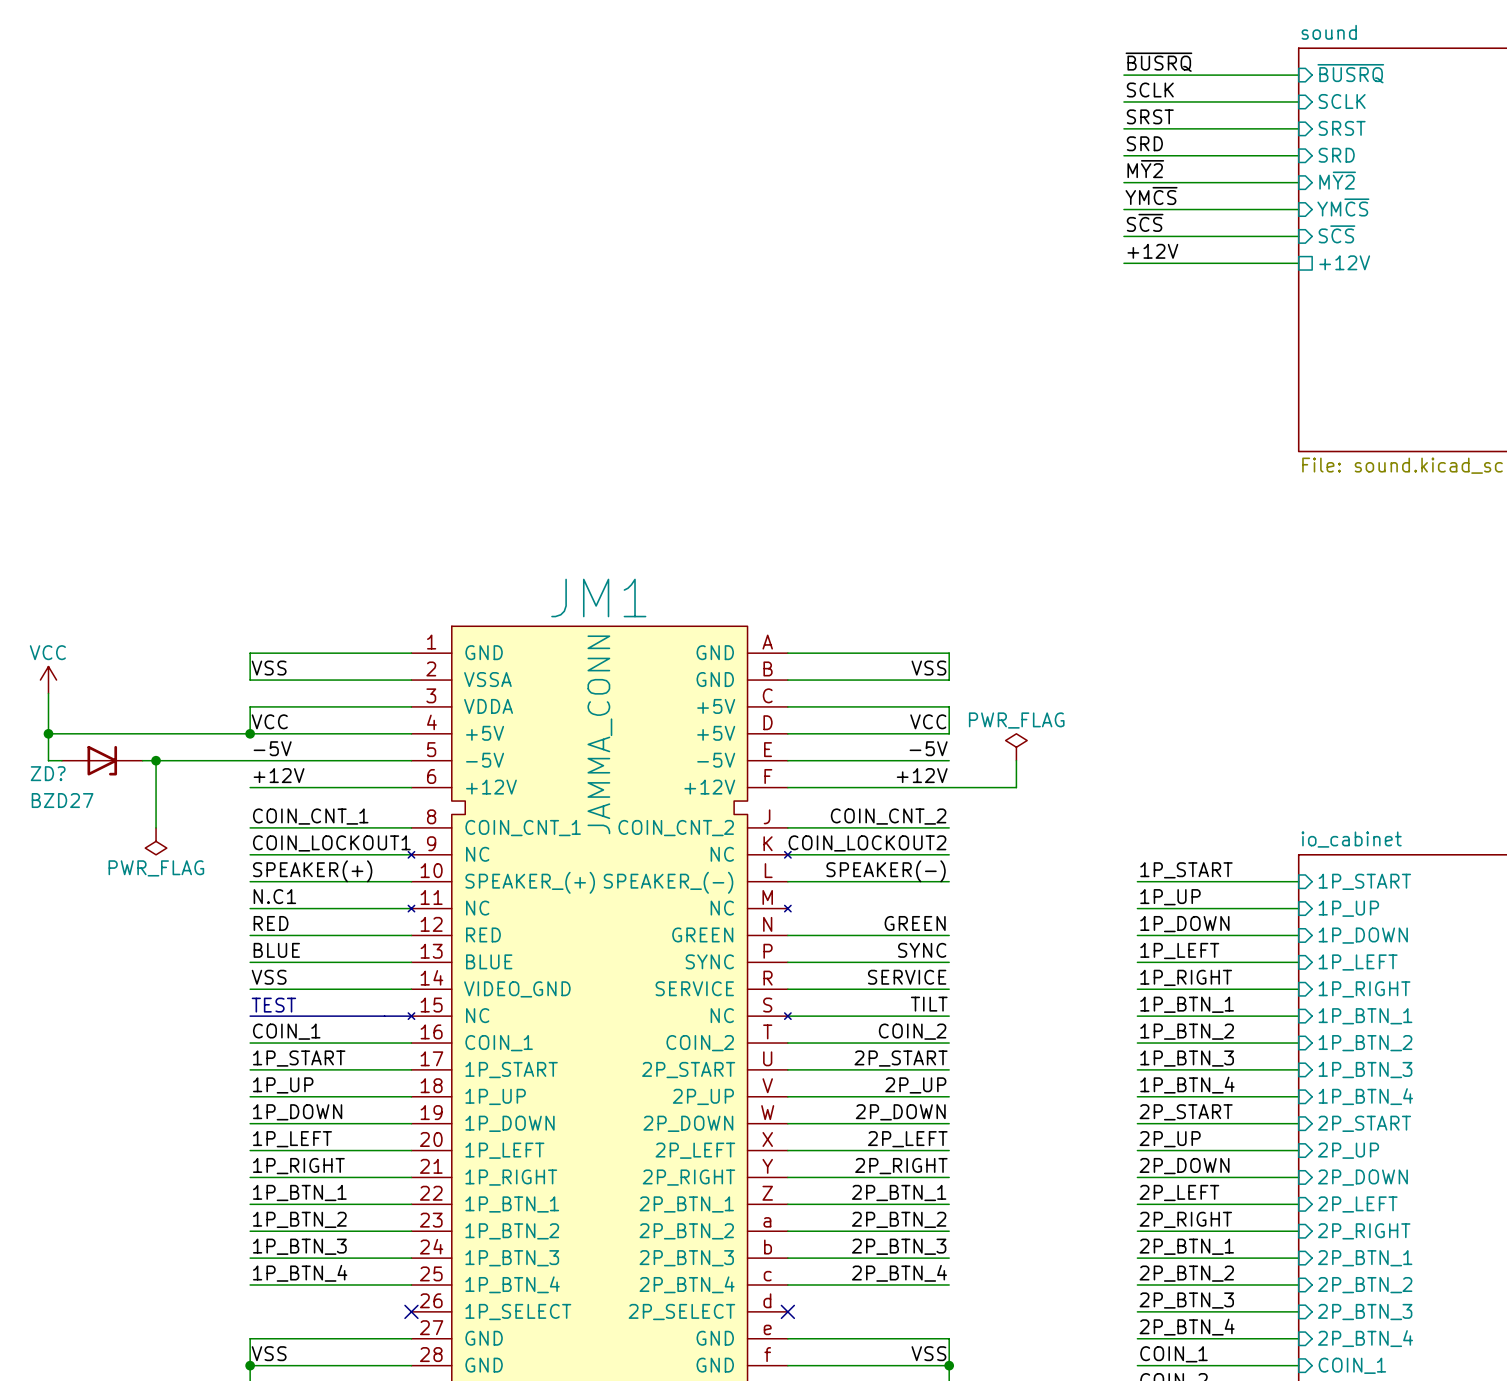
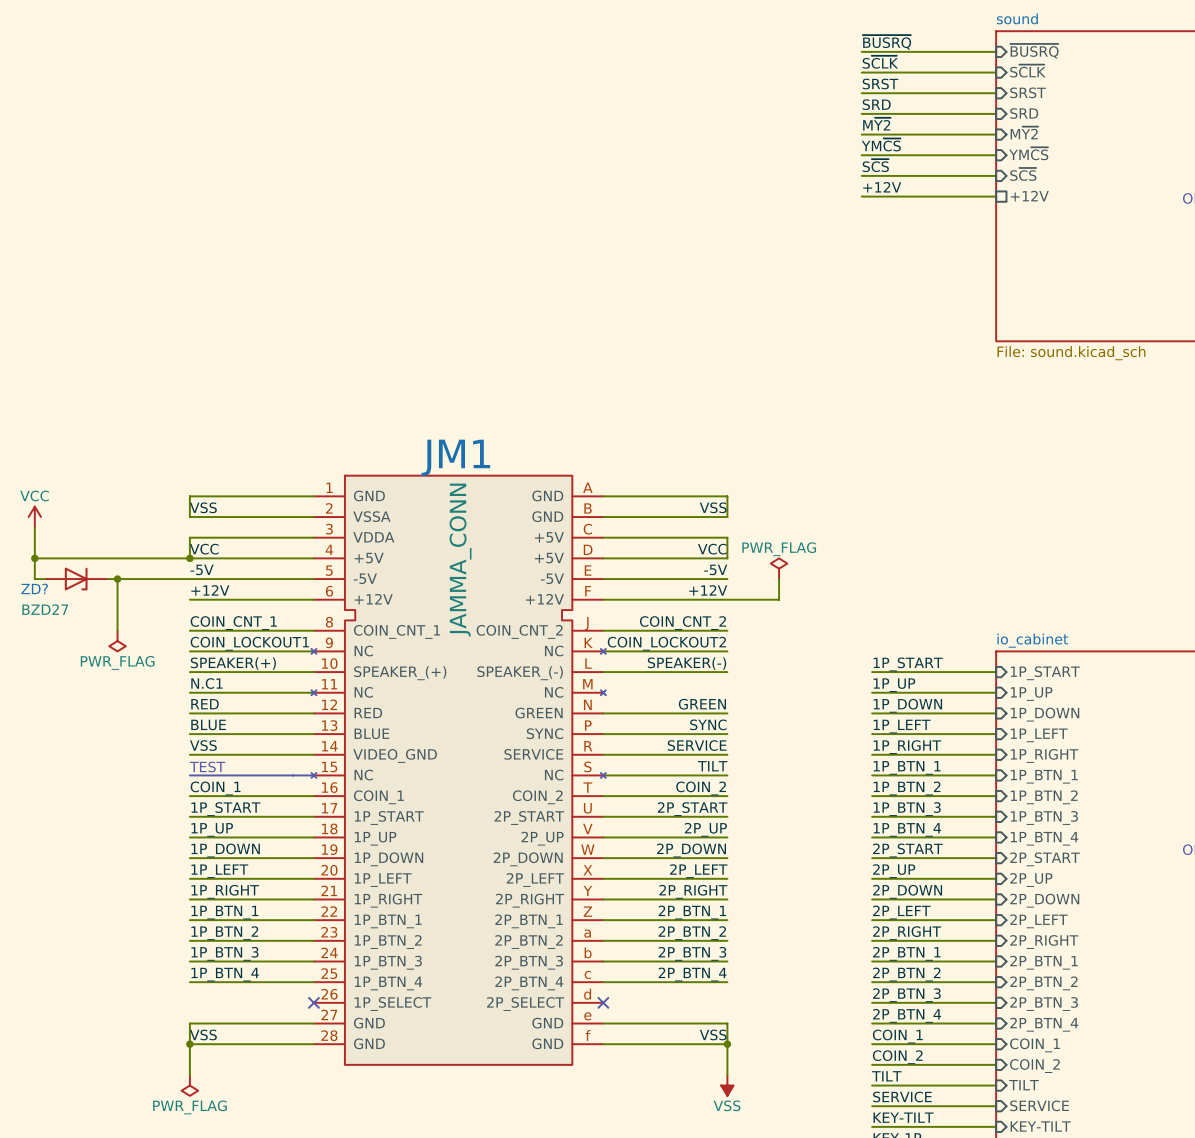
label: SCLK (1150, 89) -> S~{CLK} (880, 62)
sheet pin: SCLK (1342, 101) -> S~{CLK} (1027, 71)

